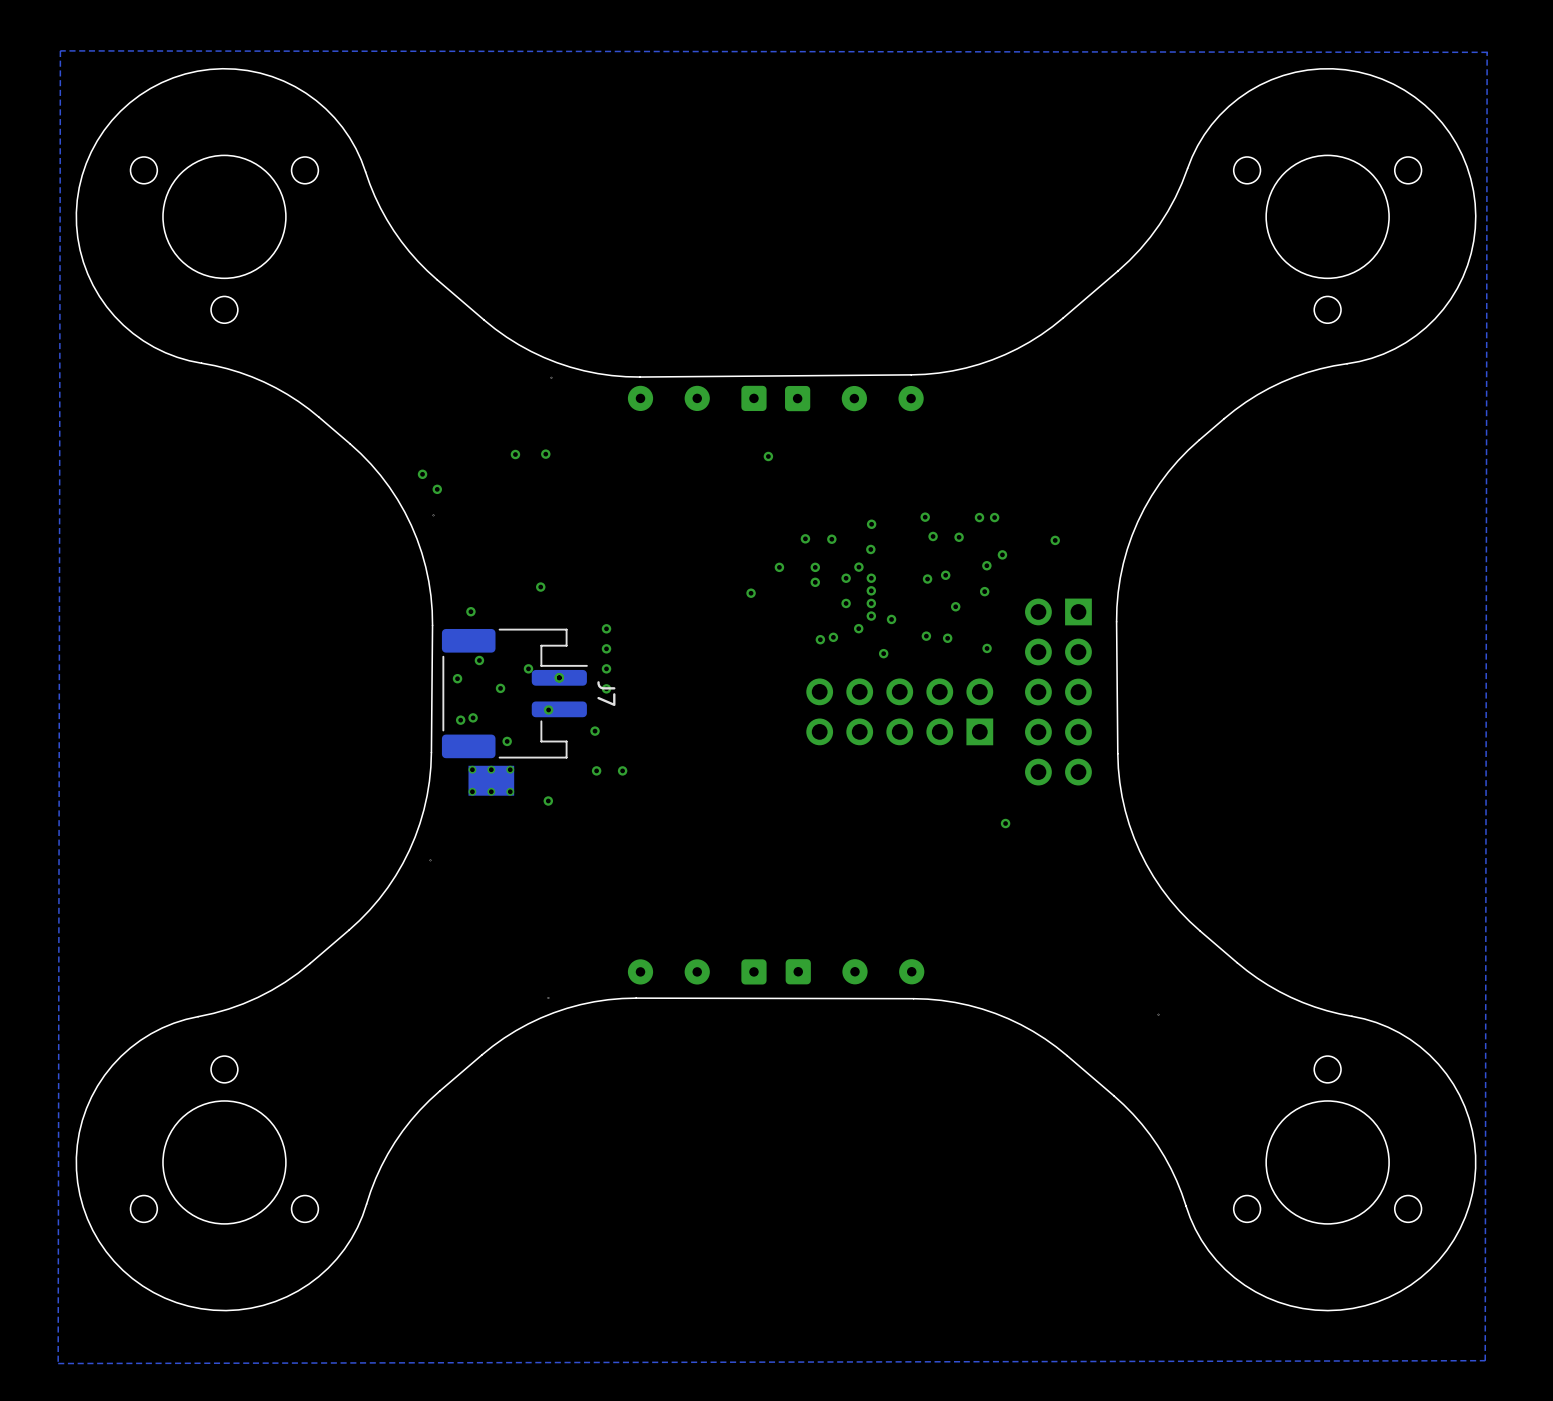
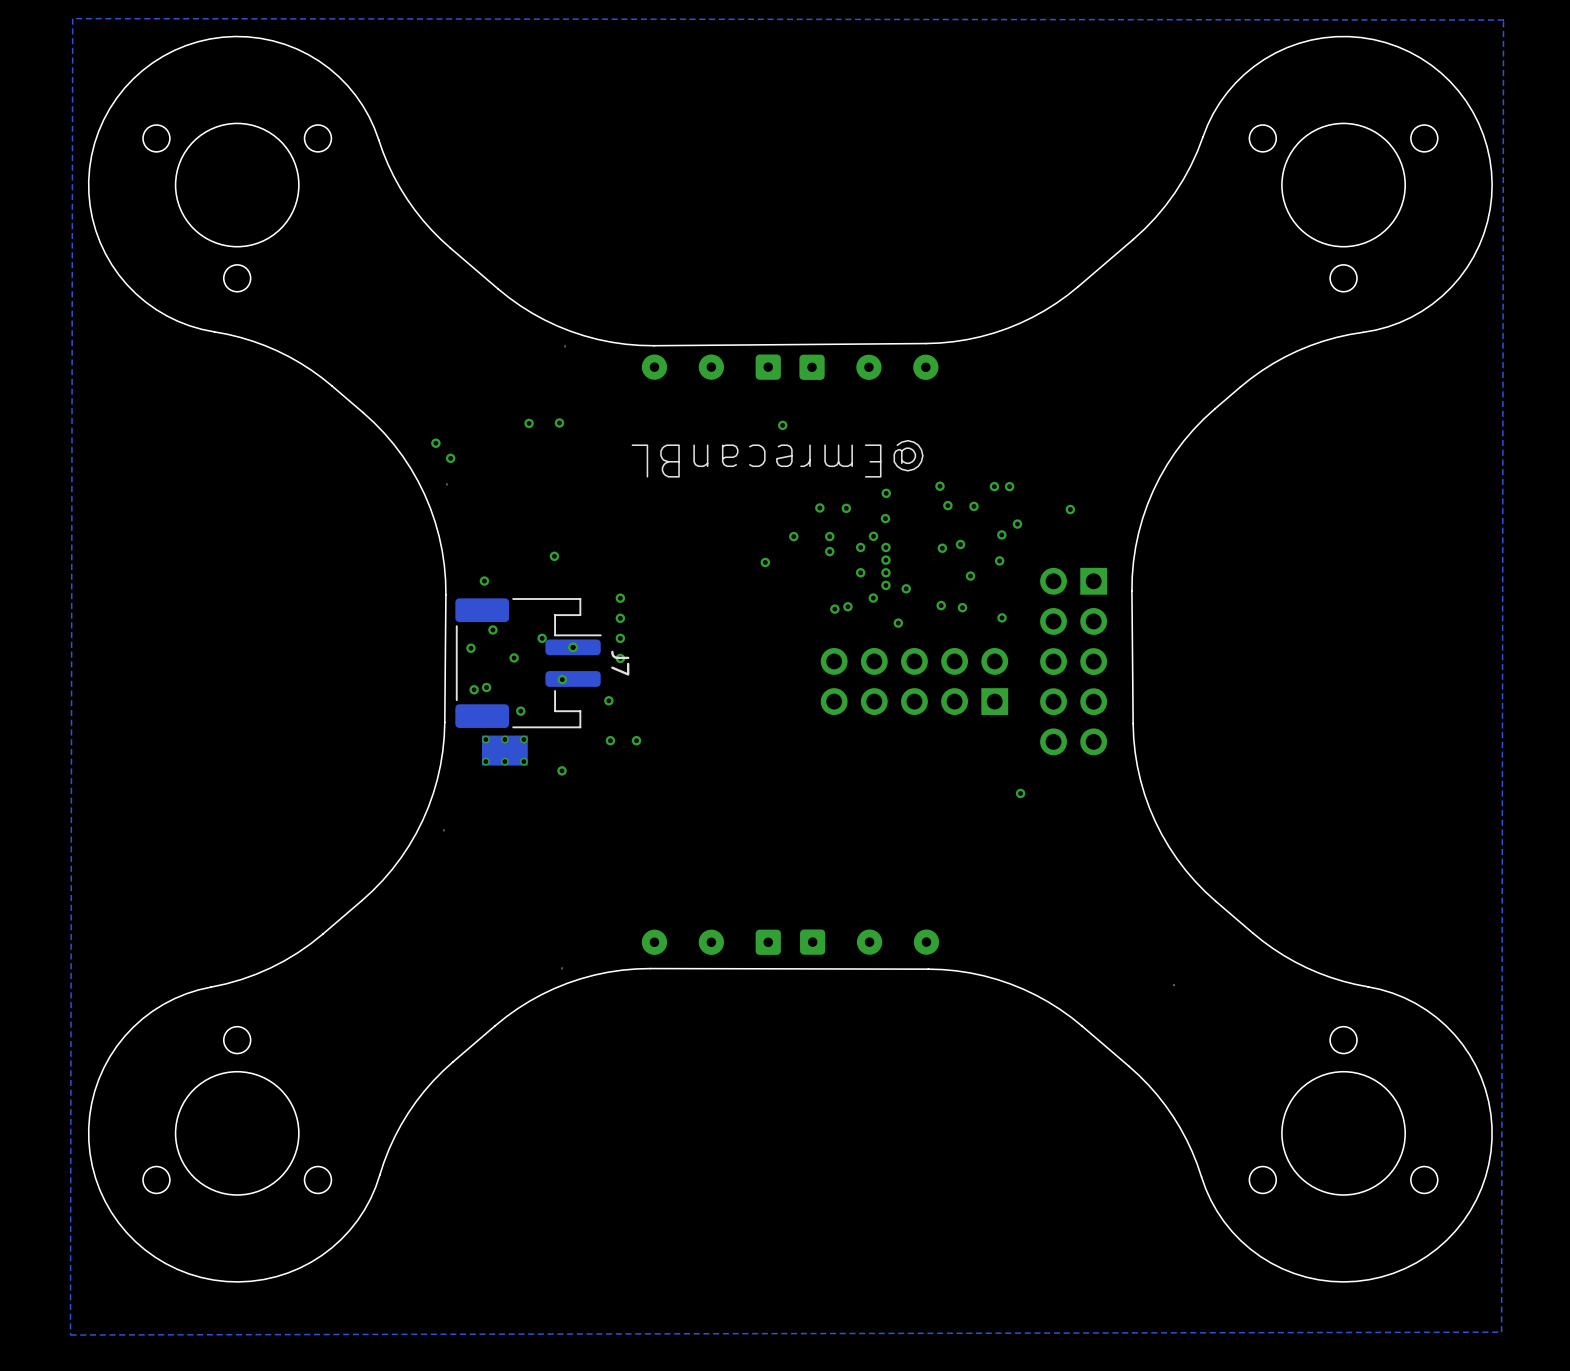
text: none -> @EmrecanBL (777, 458)

